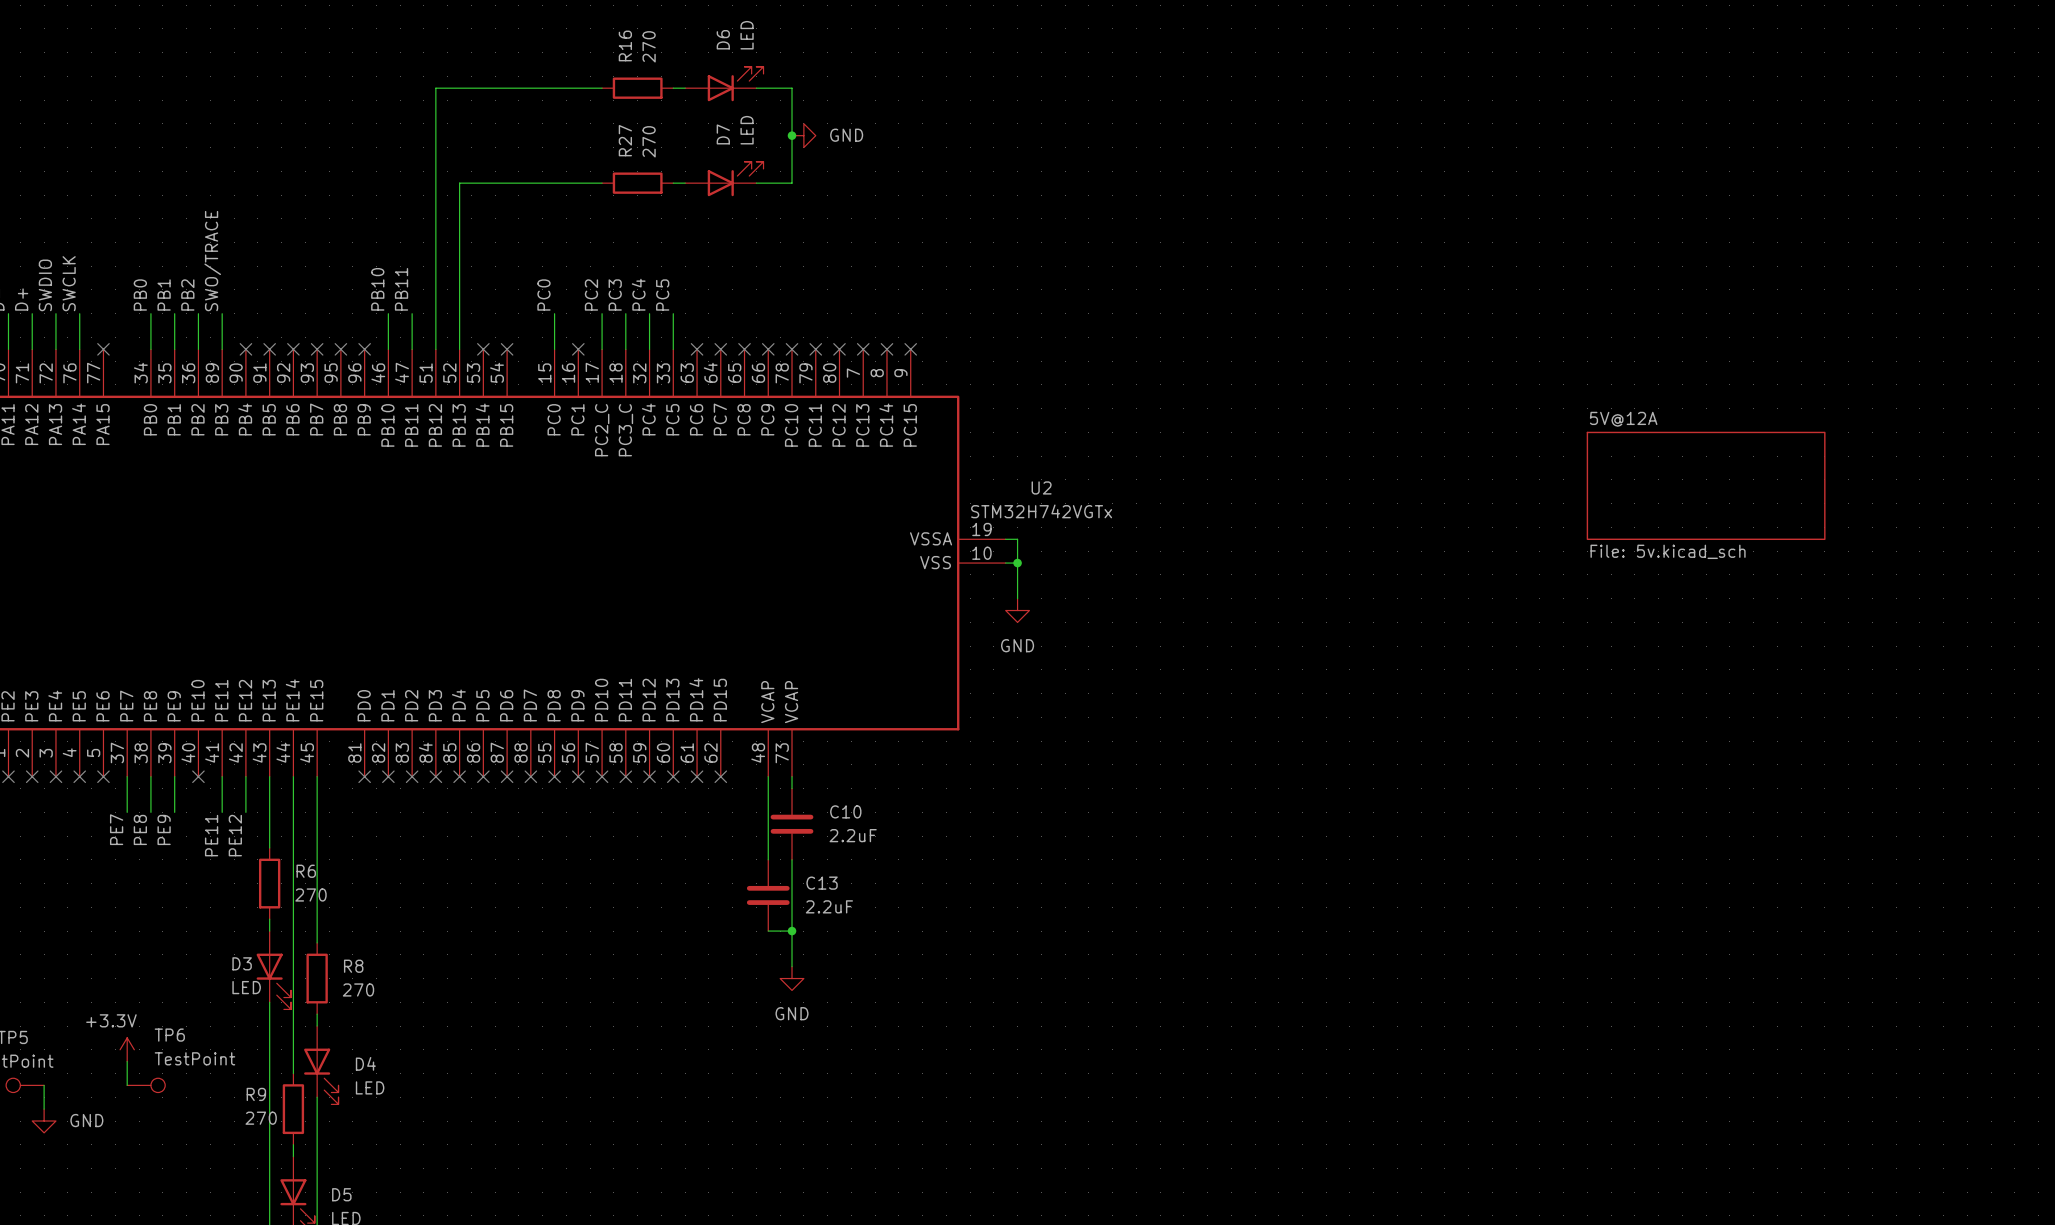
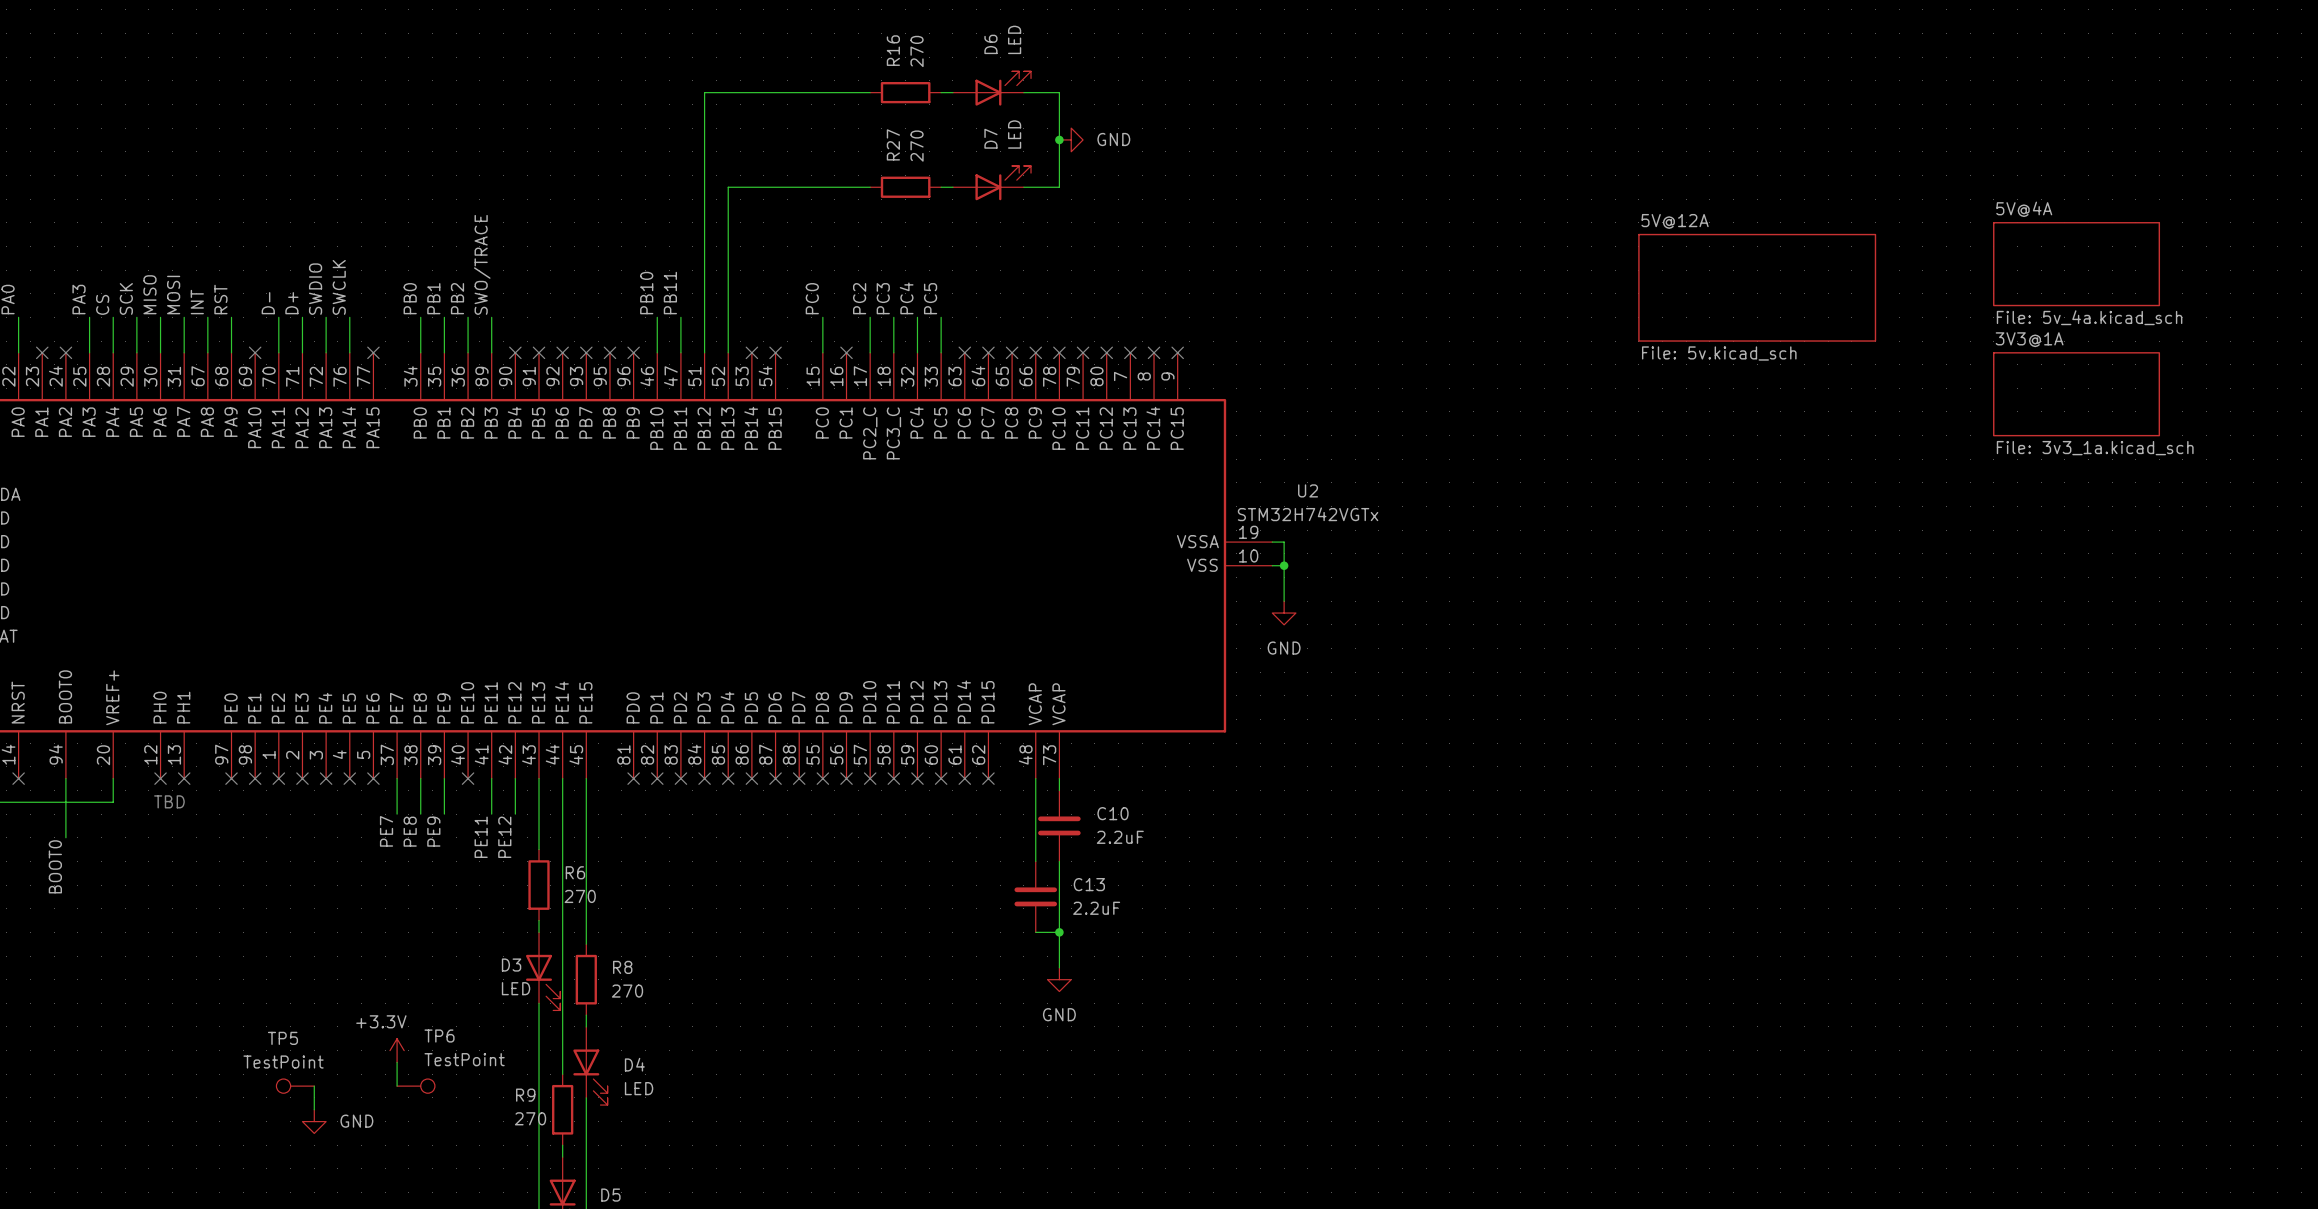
sheet 5V@4A: none -> File: 5v_4a.kicad_sch (2076, 264)
sheet 3V3@1A: none -> File: 3v3_1a.kicad_sch (2076, 394)
sheet 5V@12A position: (1706, 485) -> (1757, 287)

